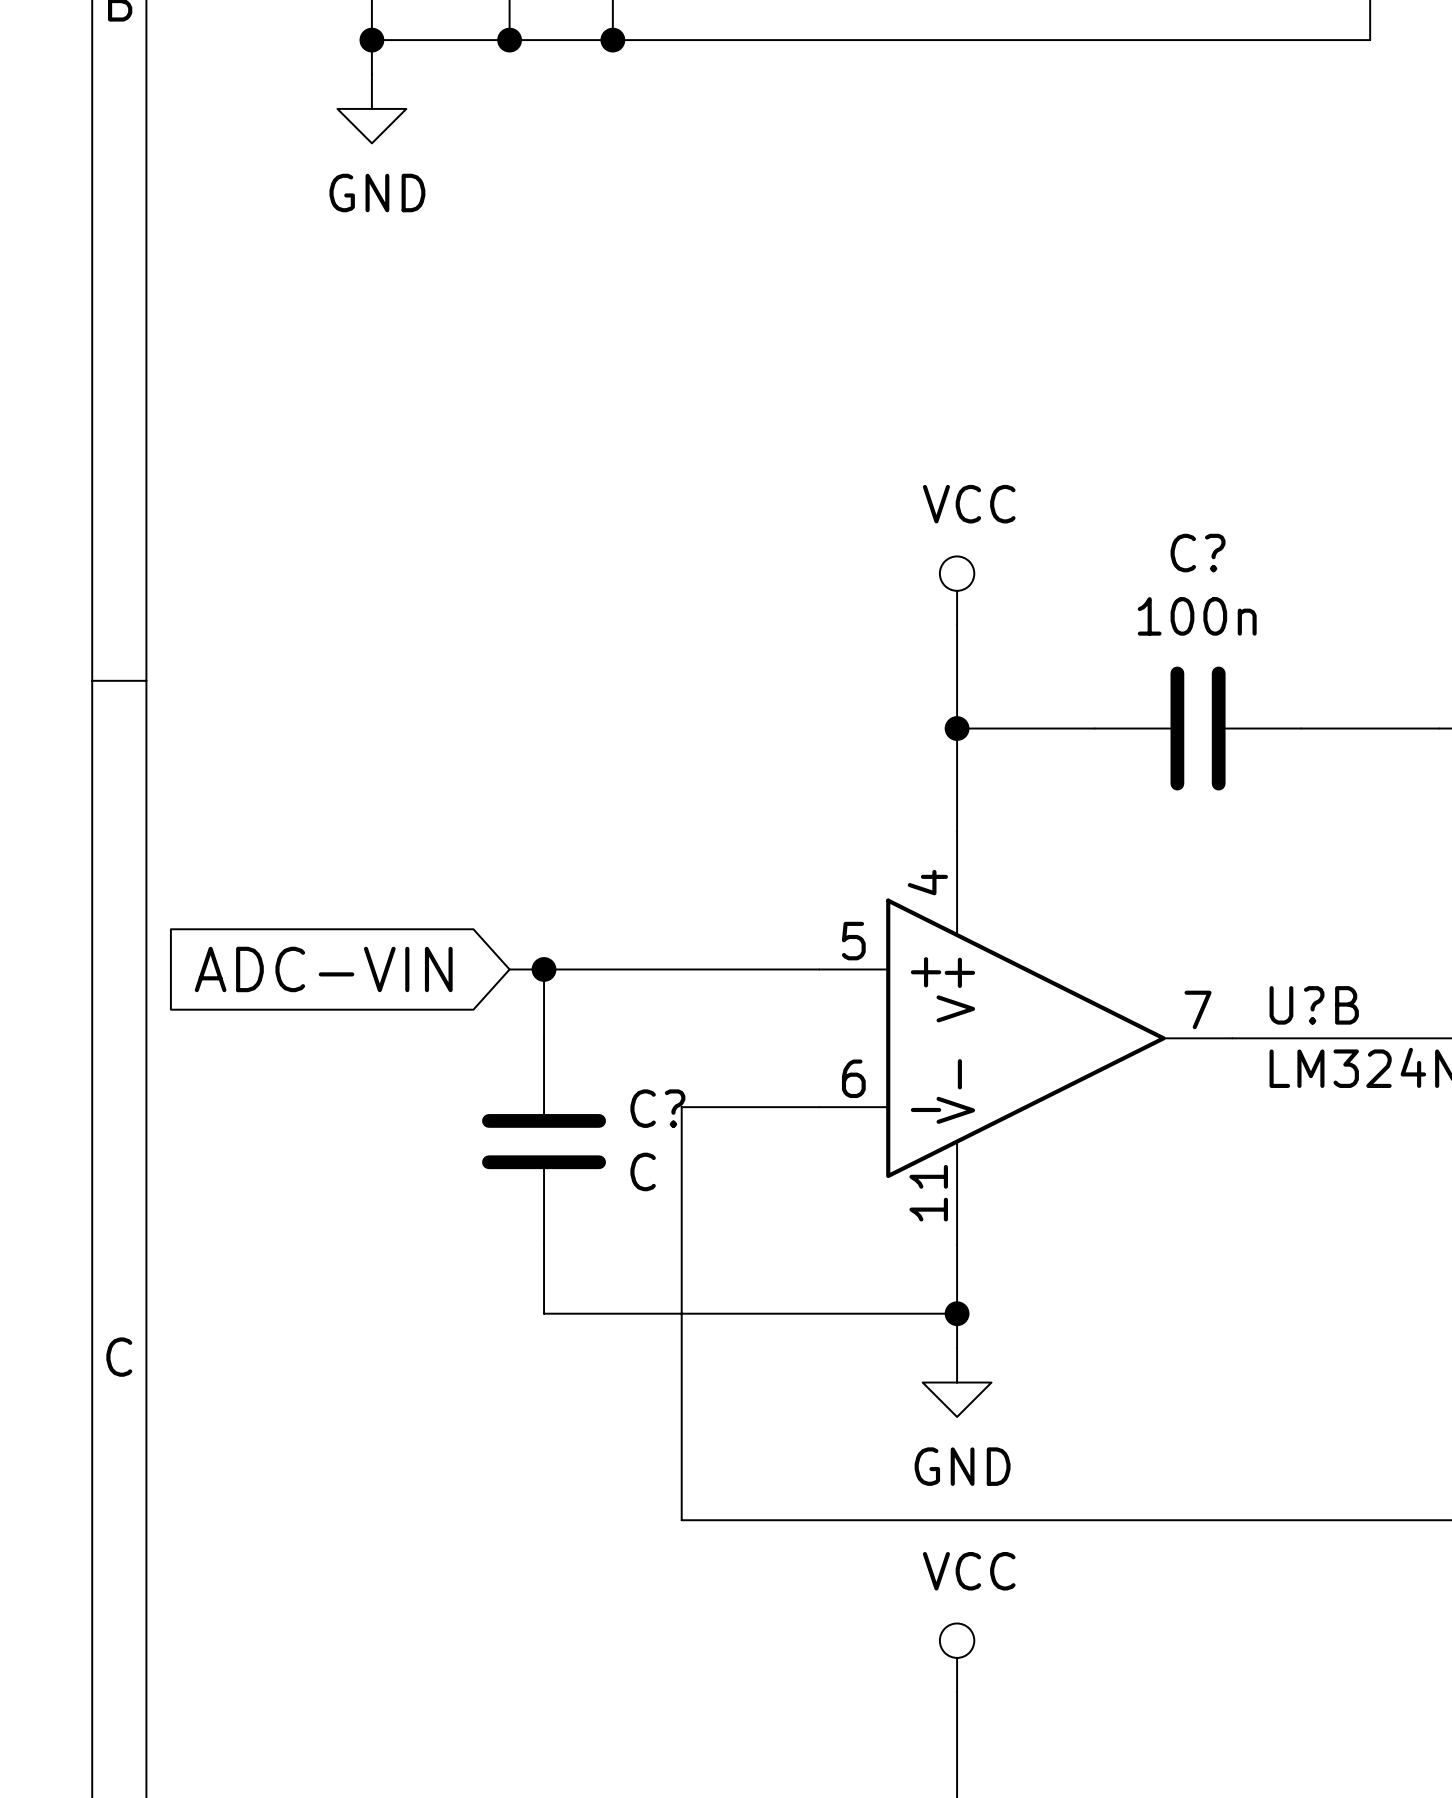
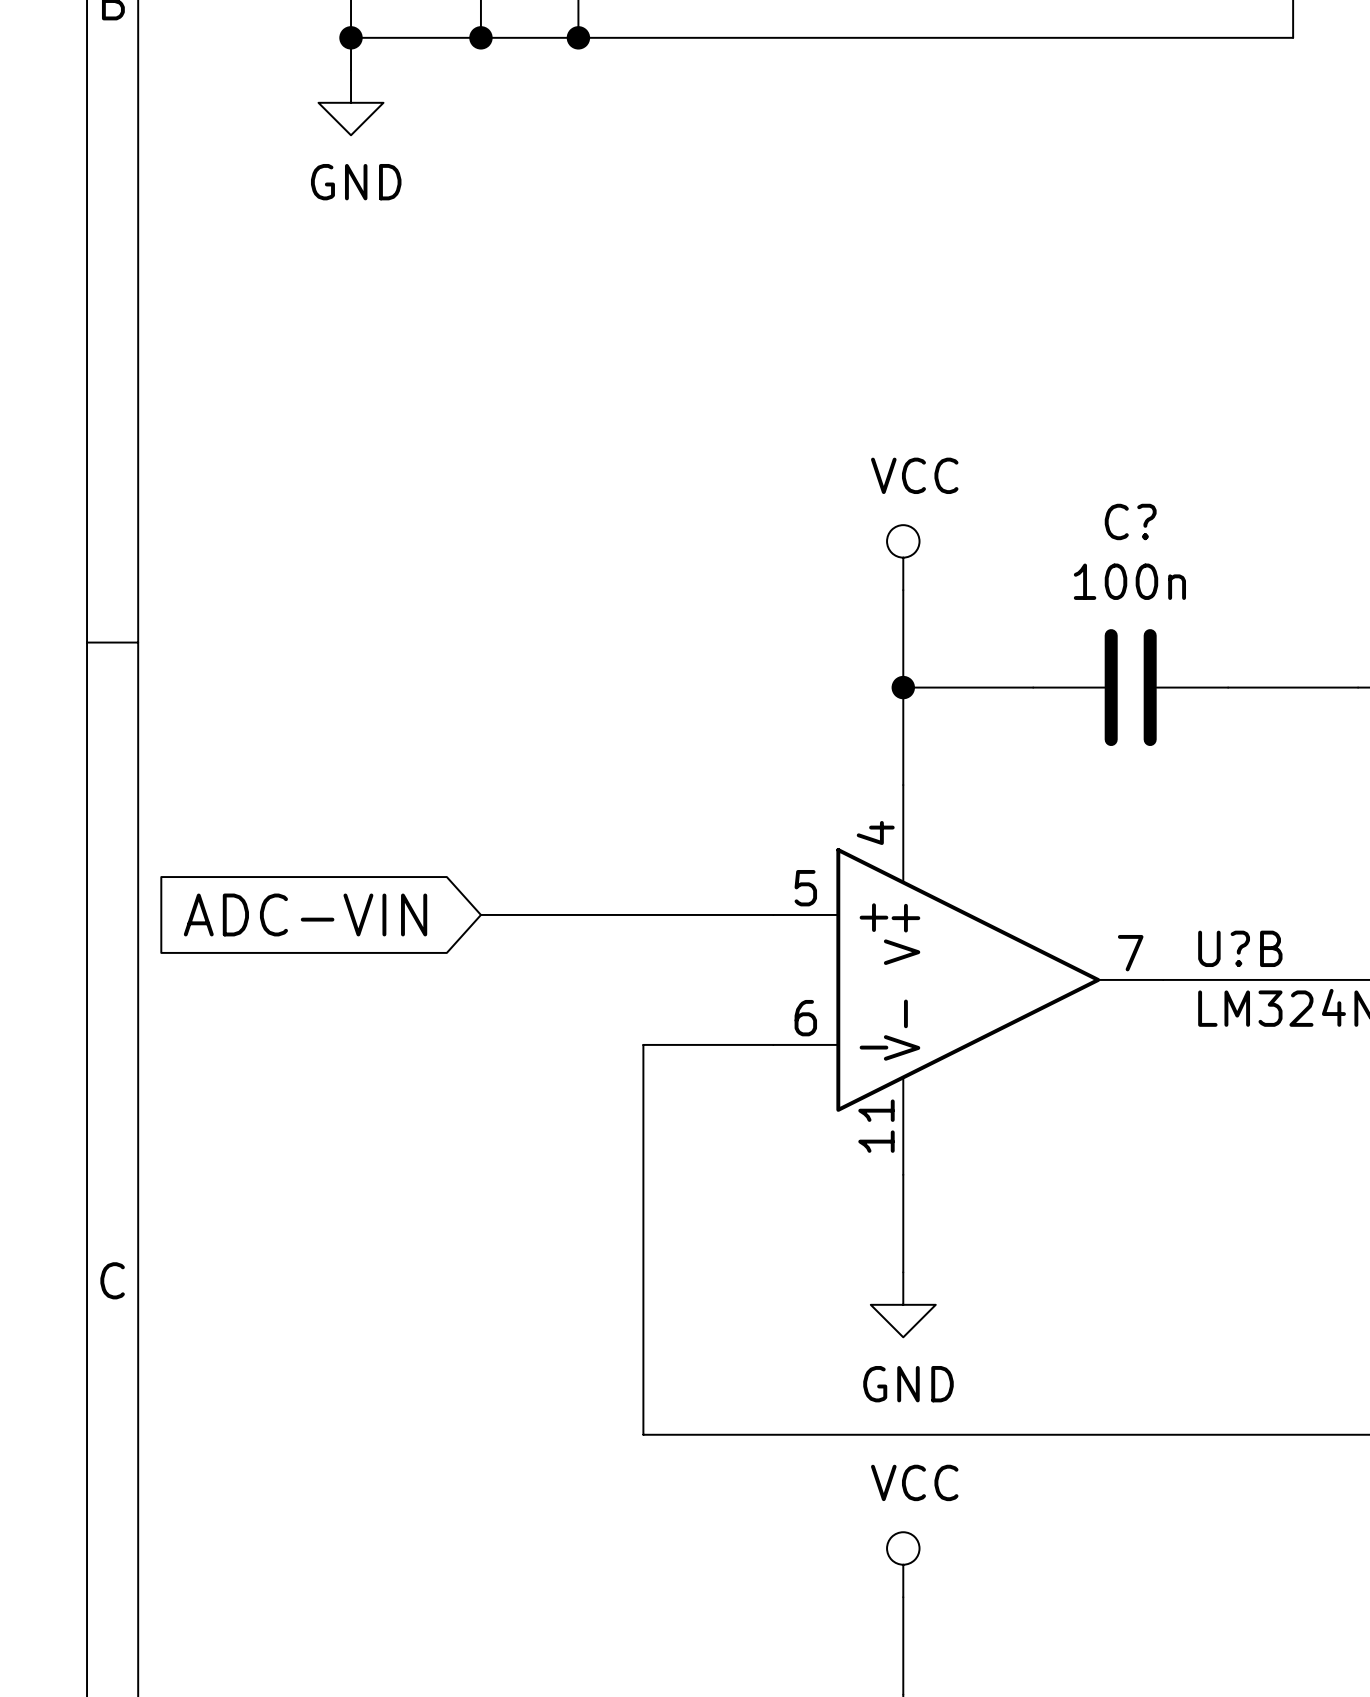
wire: (544, 969) (544, 1038) -> none
junction: (544, 969) -> none
C?: C (544, 1141) -> none
wire: (544, 1244) (544, 1313) (957, 1313) -> none
junction: (957, 1313) -> none

